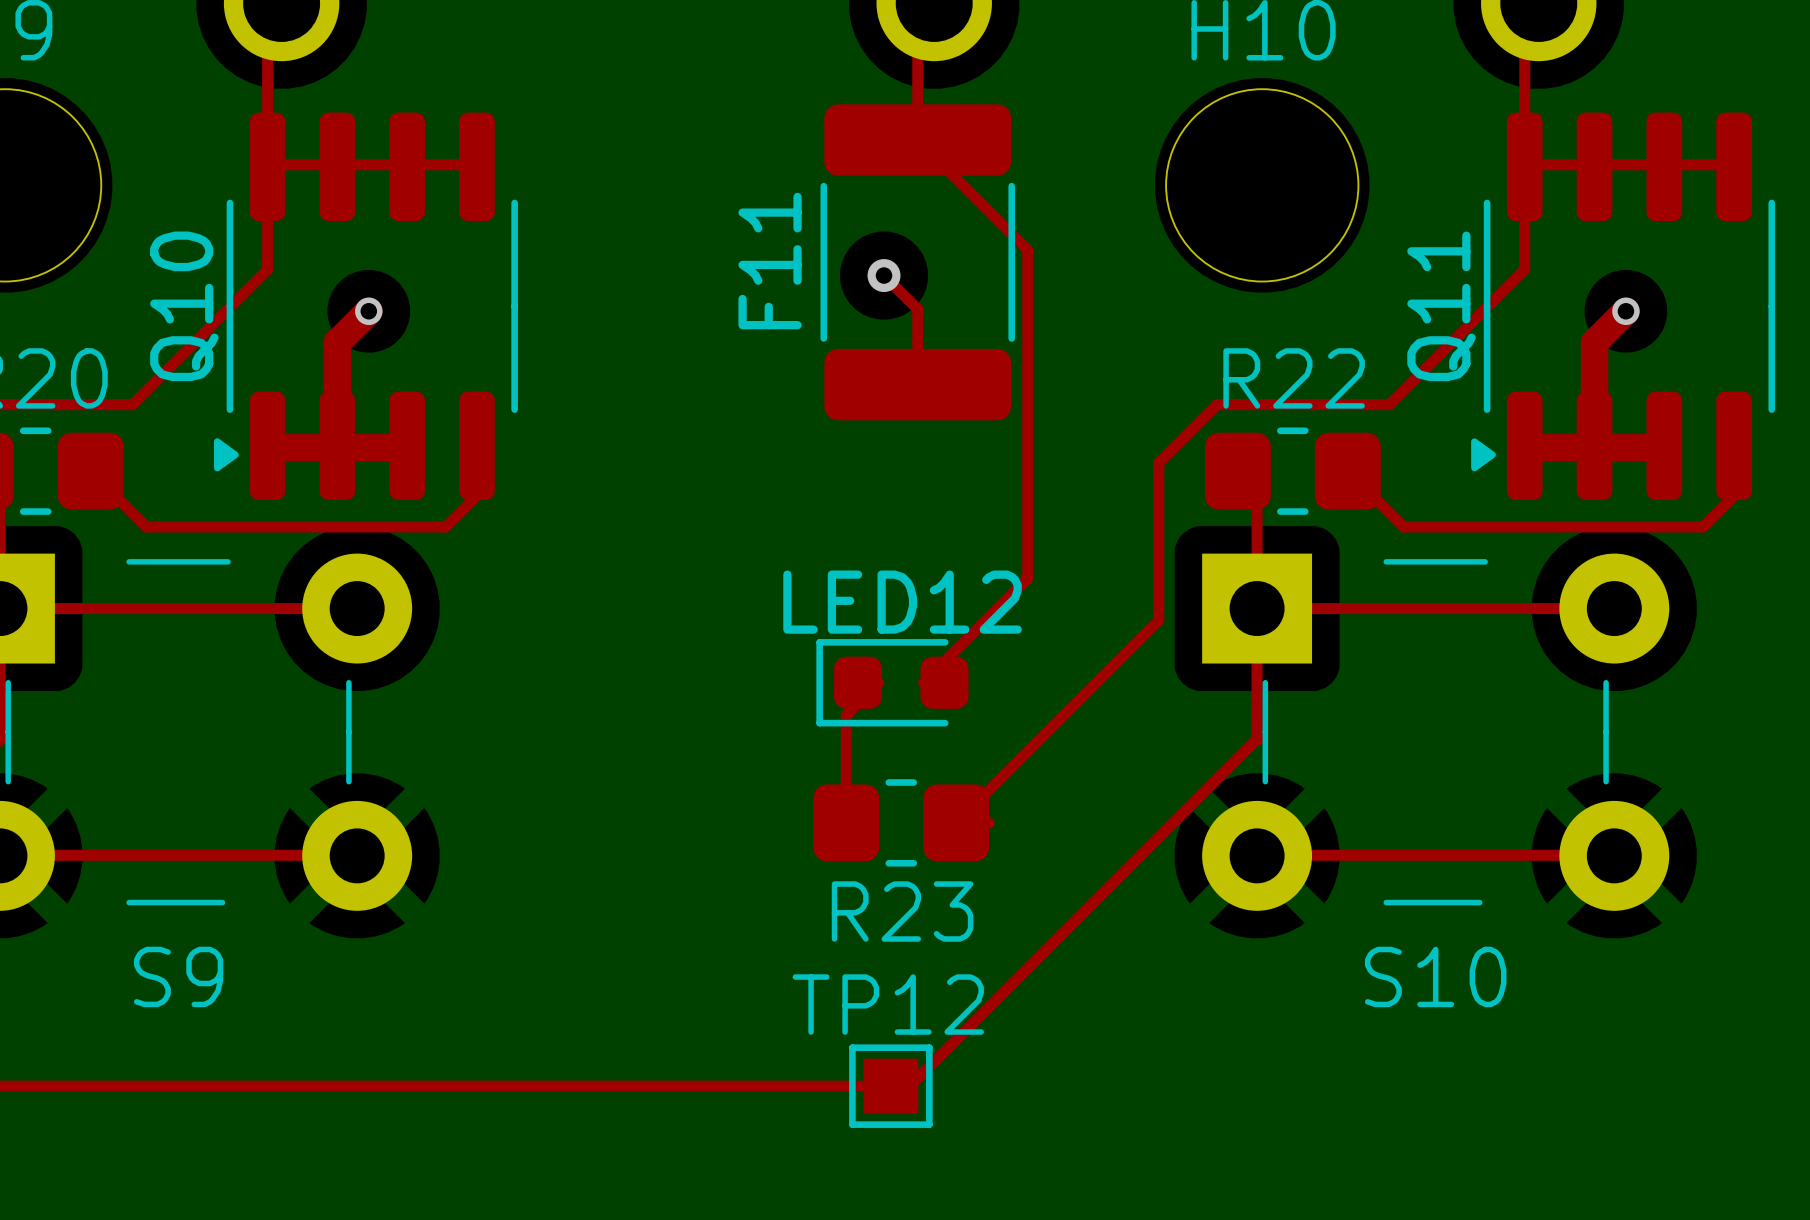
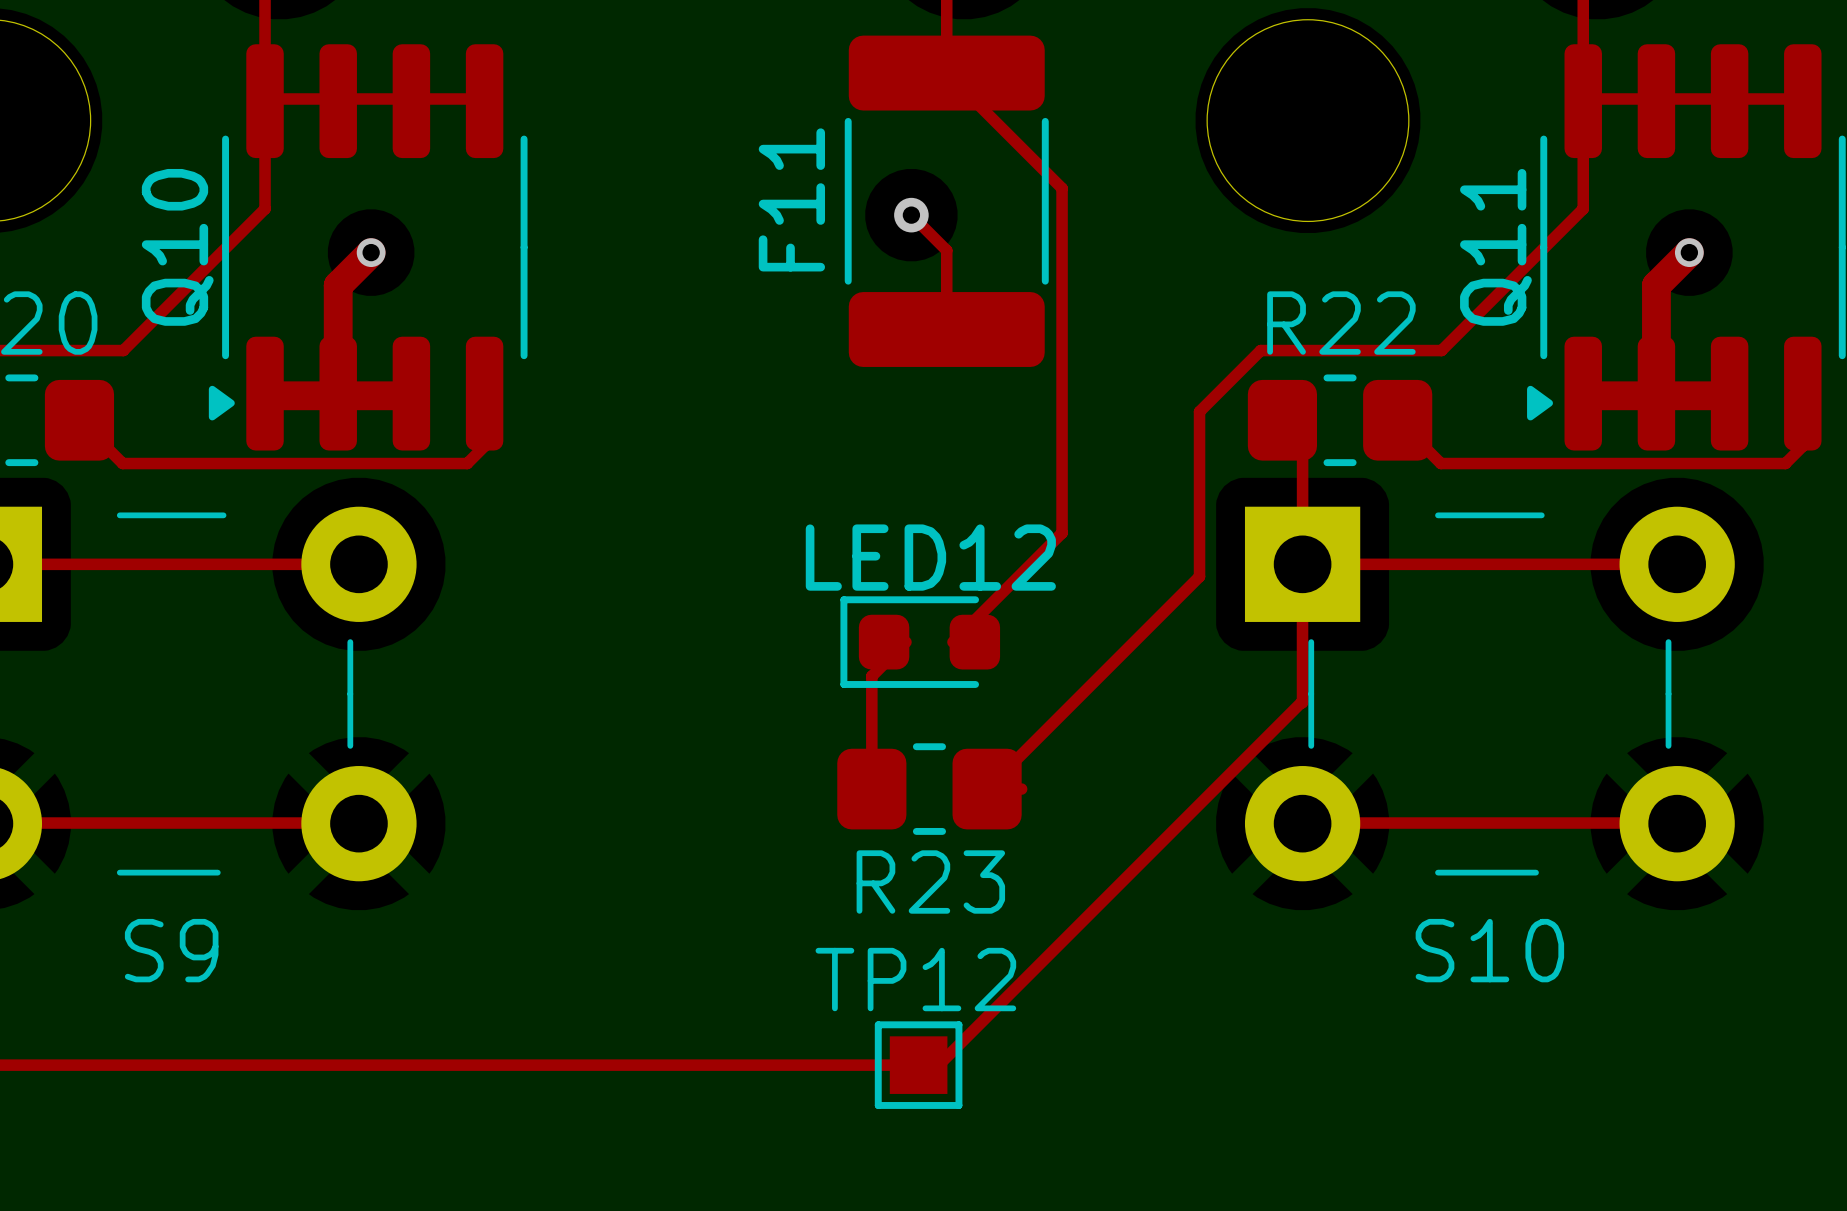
top track: (131, 512) (146, 526) (445, 526) (460, 512) -> (122, 463) (467, 463)
top track: (1389, 512) (1403, 526) (1703, 526) (1717, 512) -> (1440, 463) (1785, 463)

